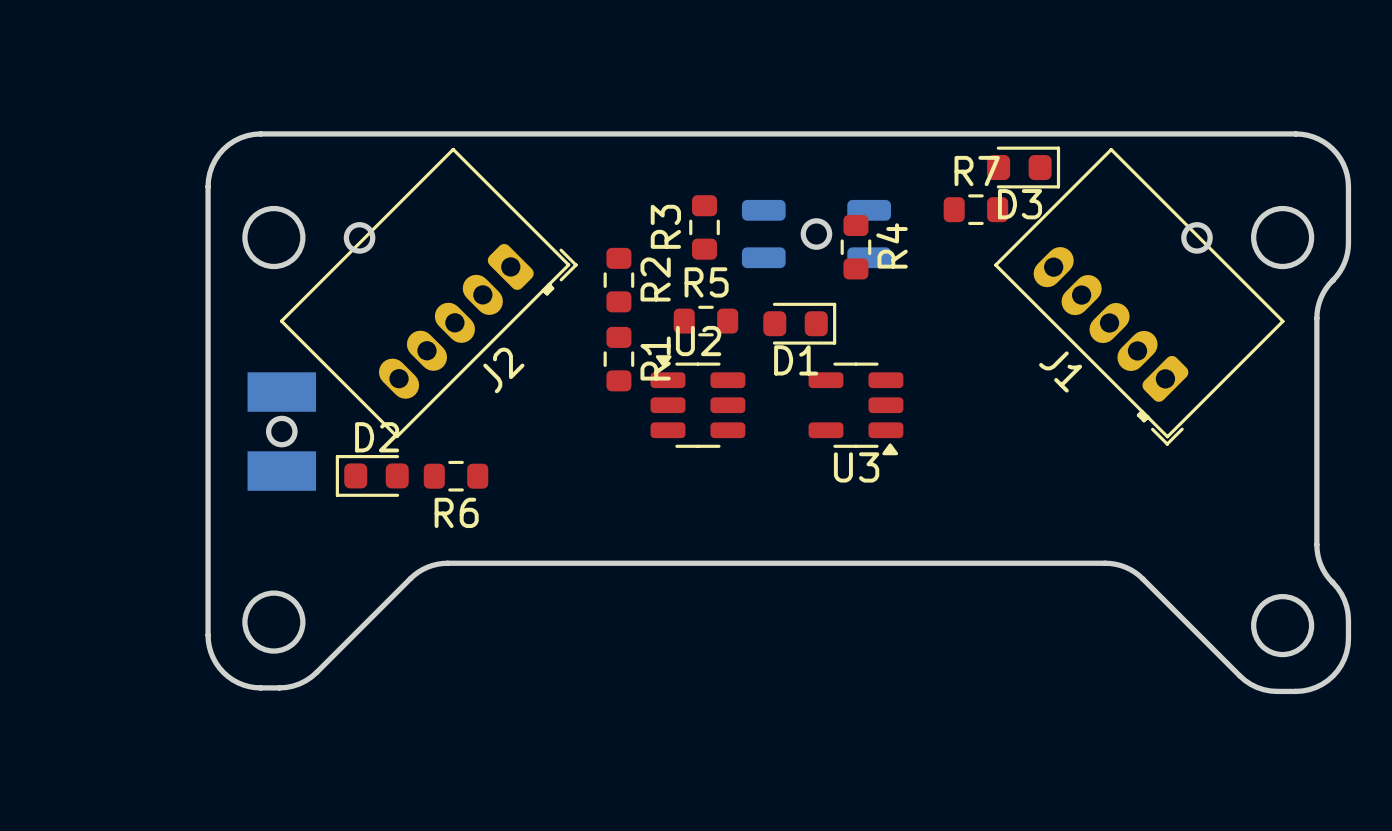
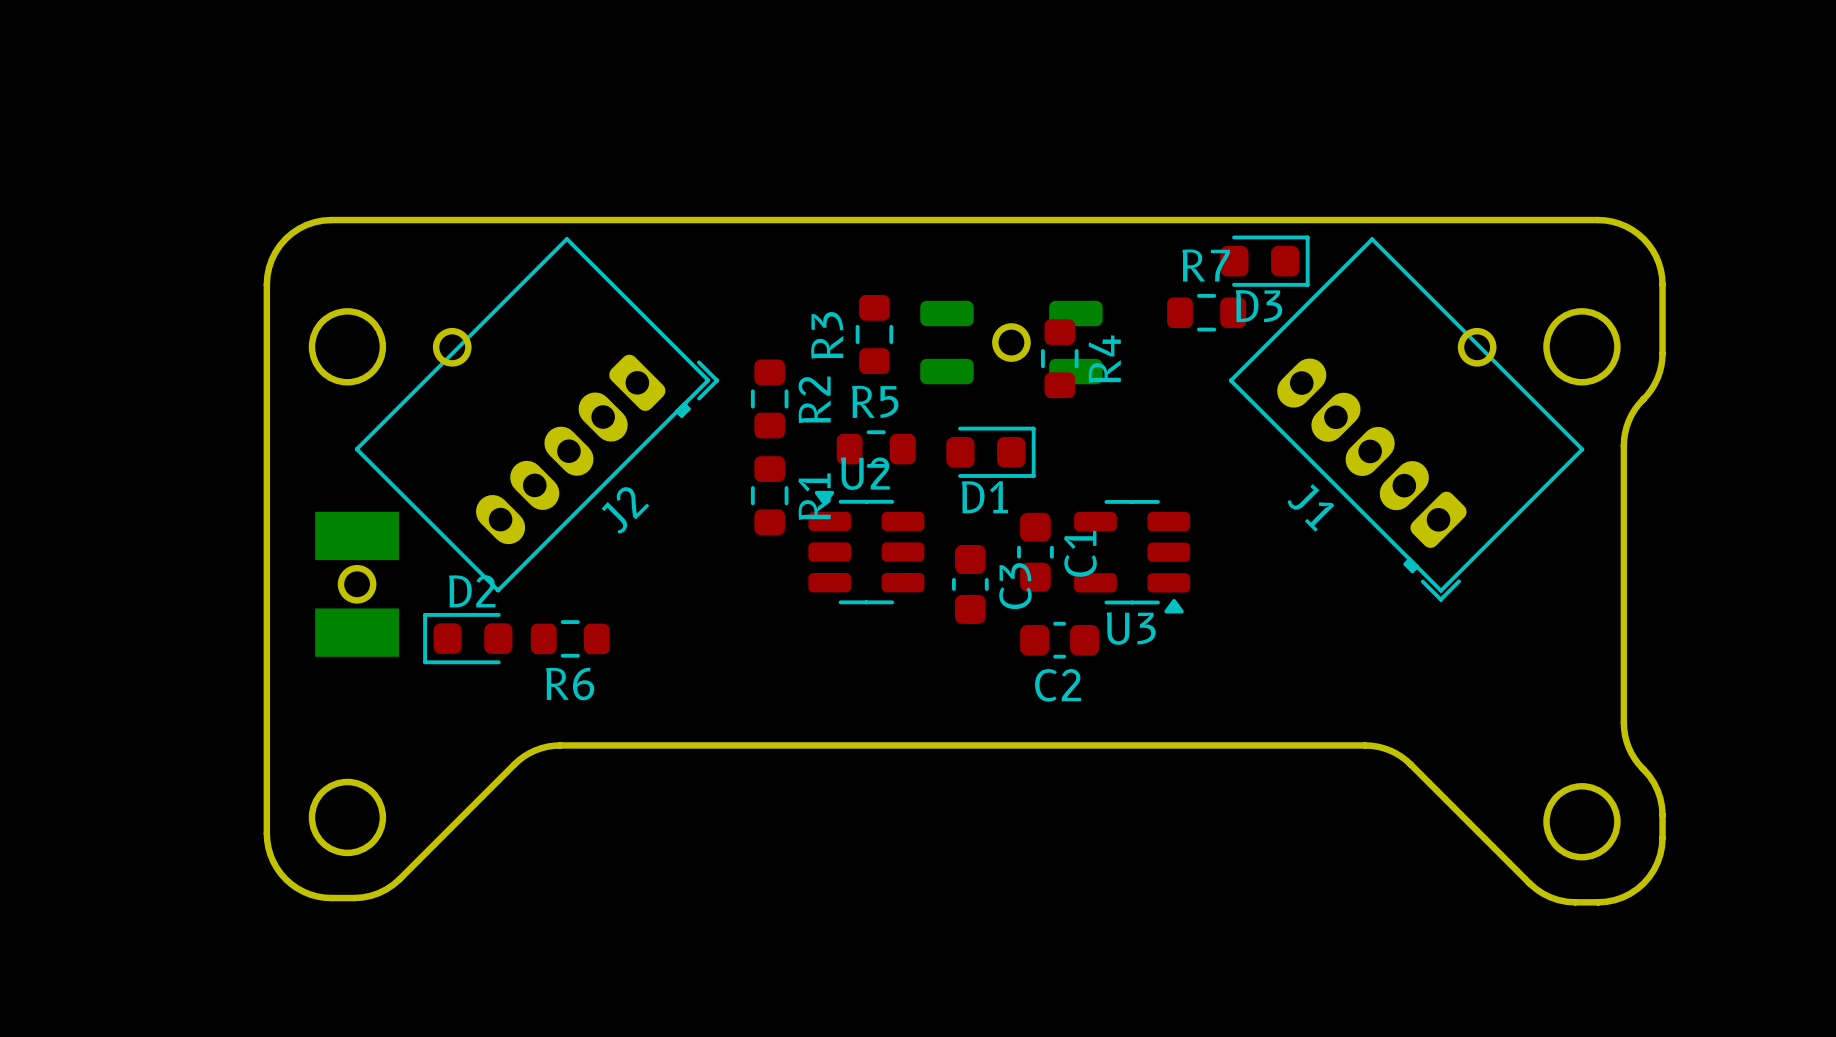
C1: none -> (1035, 552)
U3 position: (855, 408) -> (1132, 556)
C3: none -> (970, 584)
C2: none -> (1059, 640)

